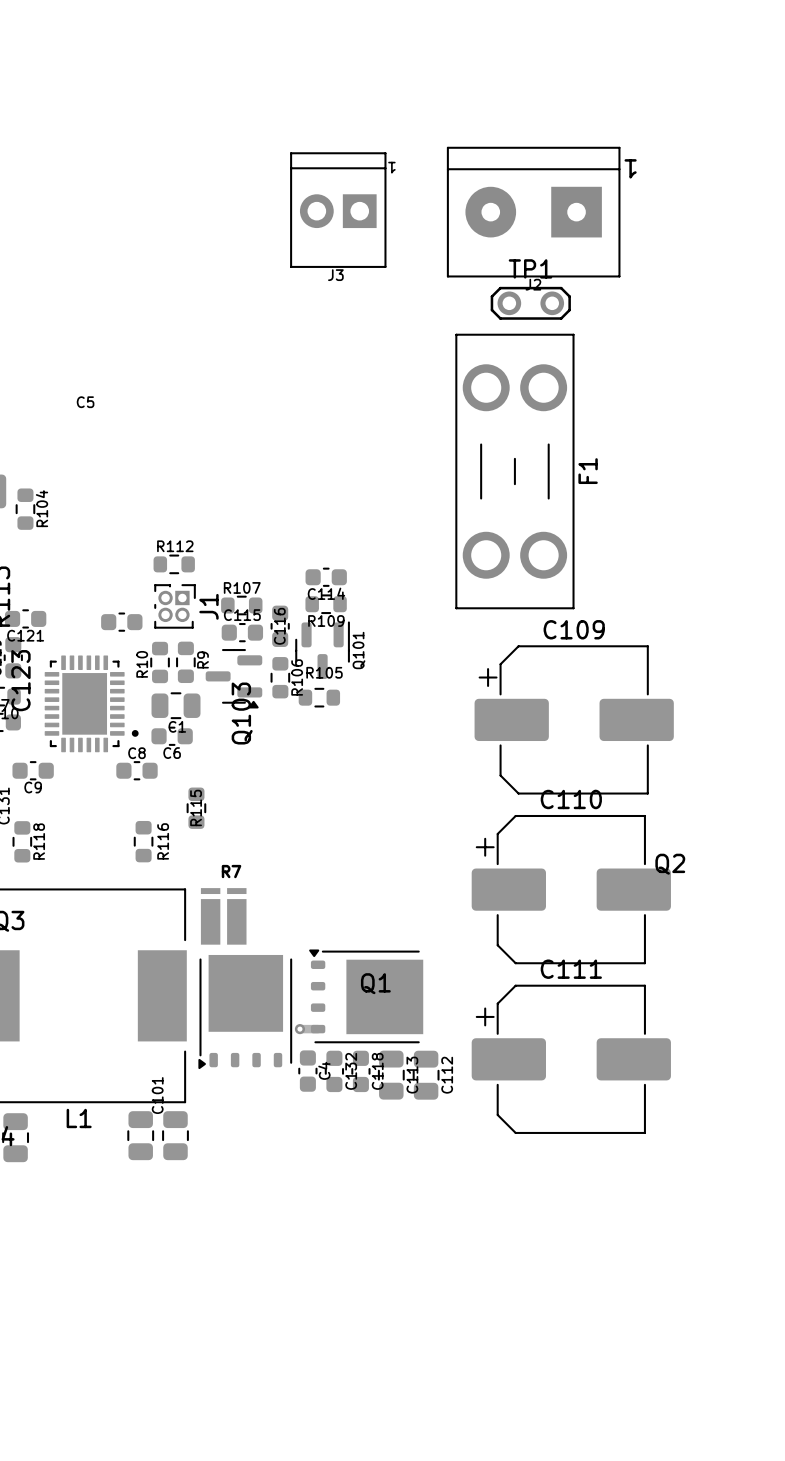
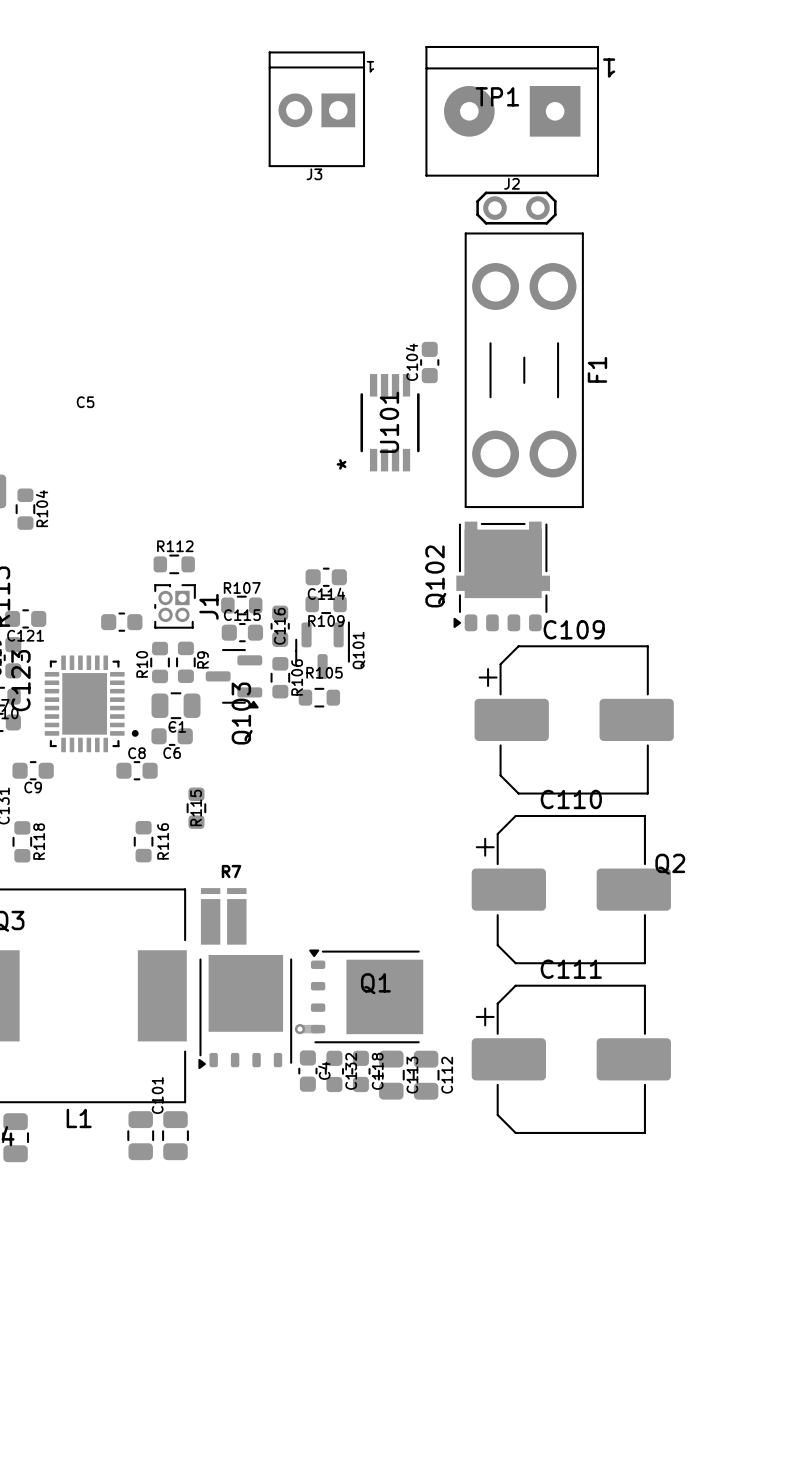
J3 position: (338, 210) -> (316, 109)
J2 position: (533, 212) -> (512, 111)
TP1 name position: TP1 (530, 268) -> TP1 (497, 96)
TP1 position: (530, 303) -> (516, 208)
C104: none -> (429, 362)
U101: none -> (390, 422)
F1 position: (514, 471) -> (524, 370)
Q102: none -> (501, 576)

